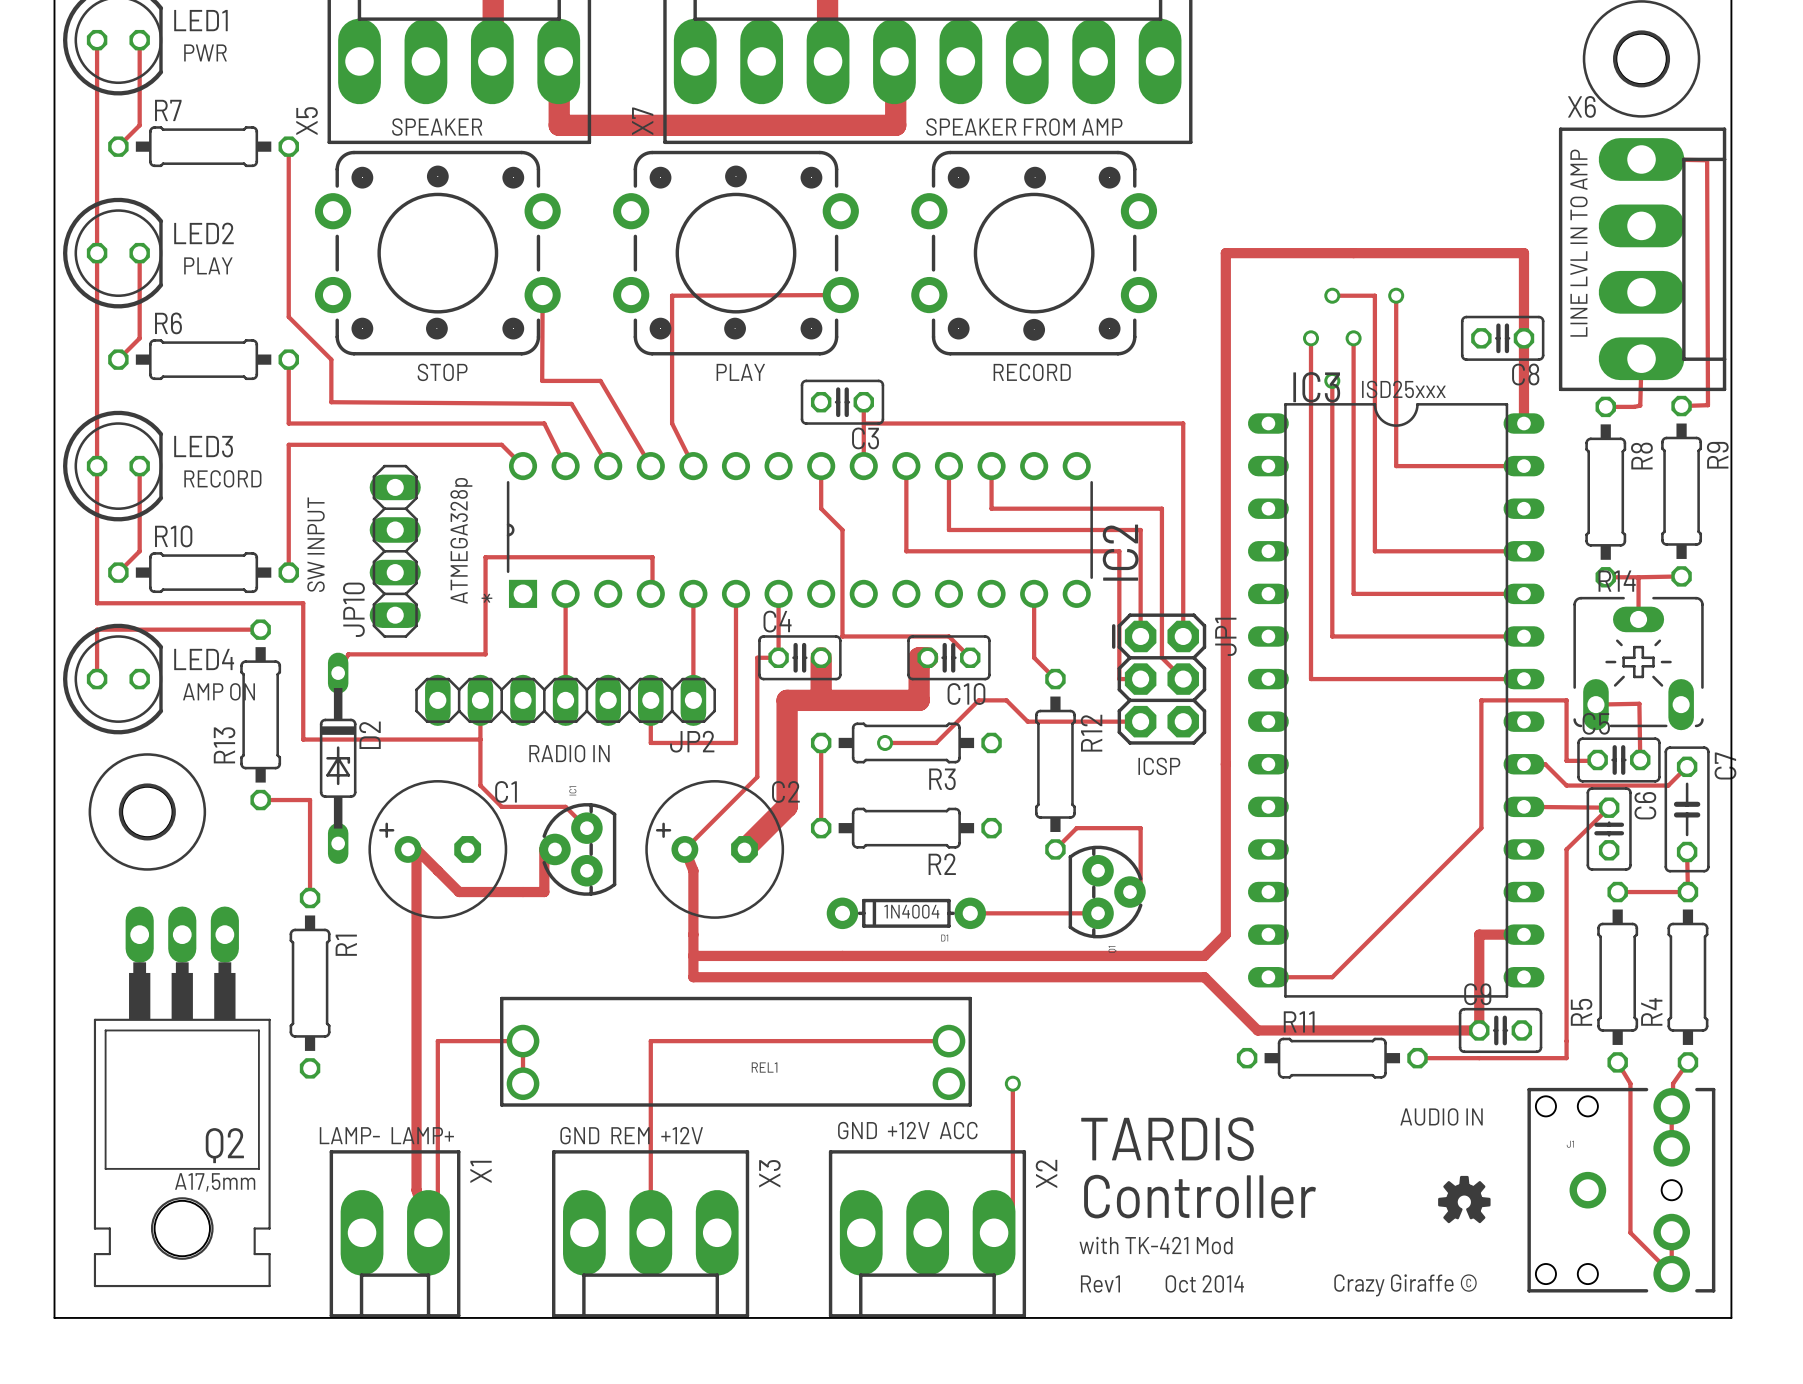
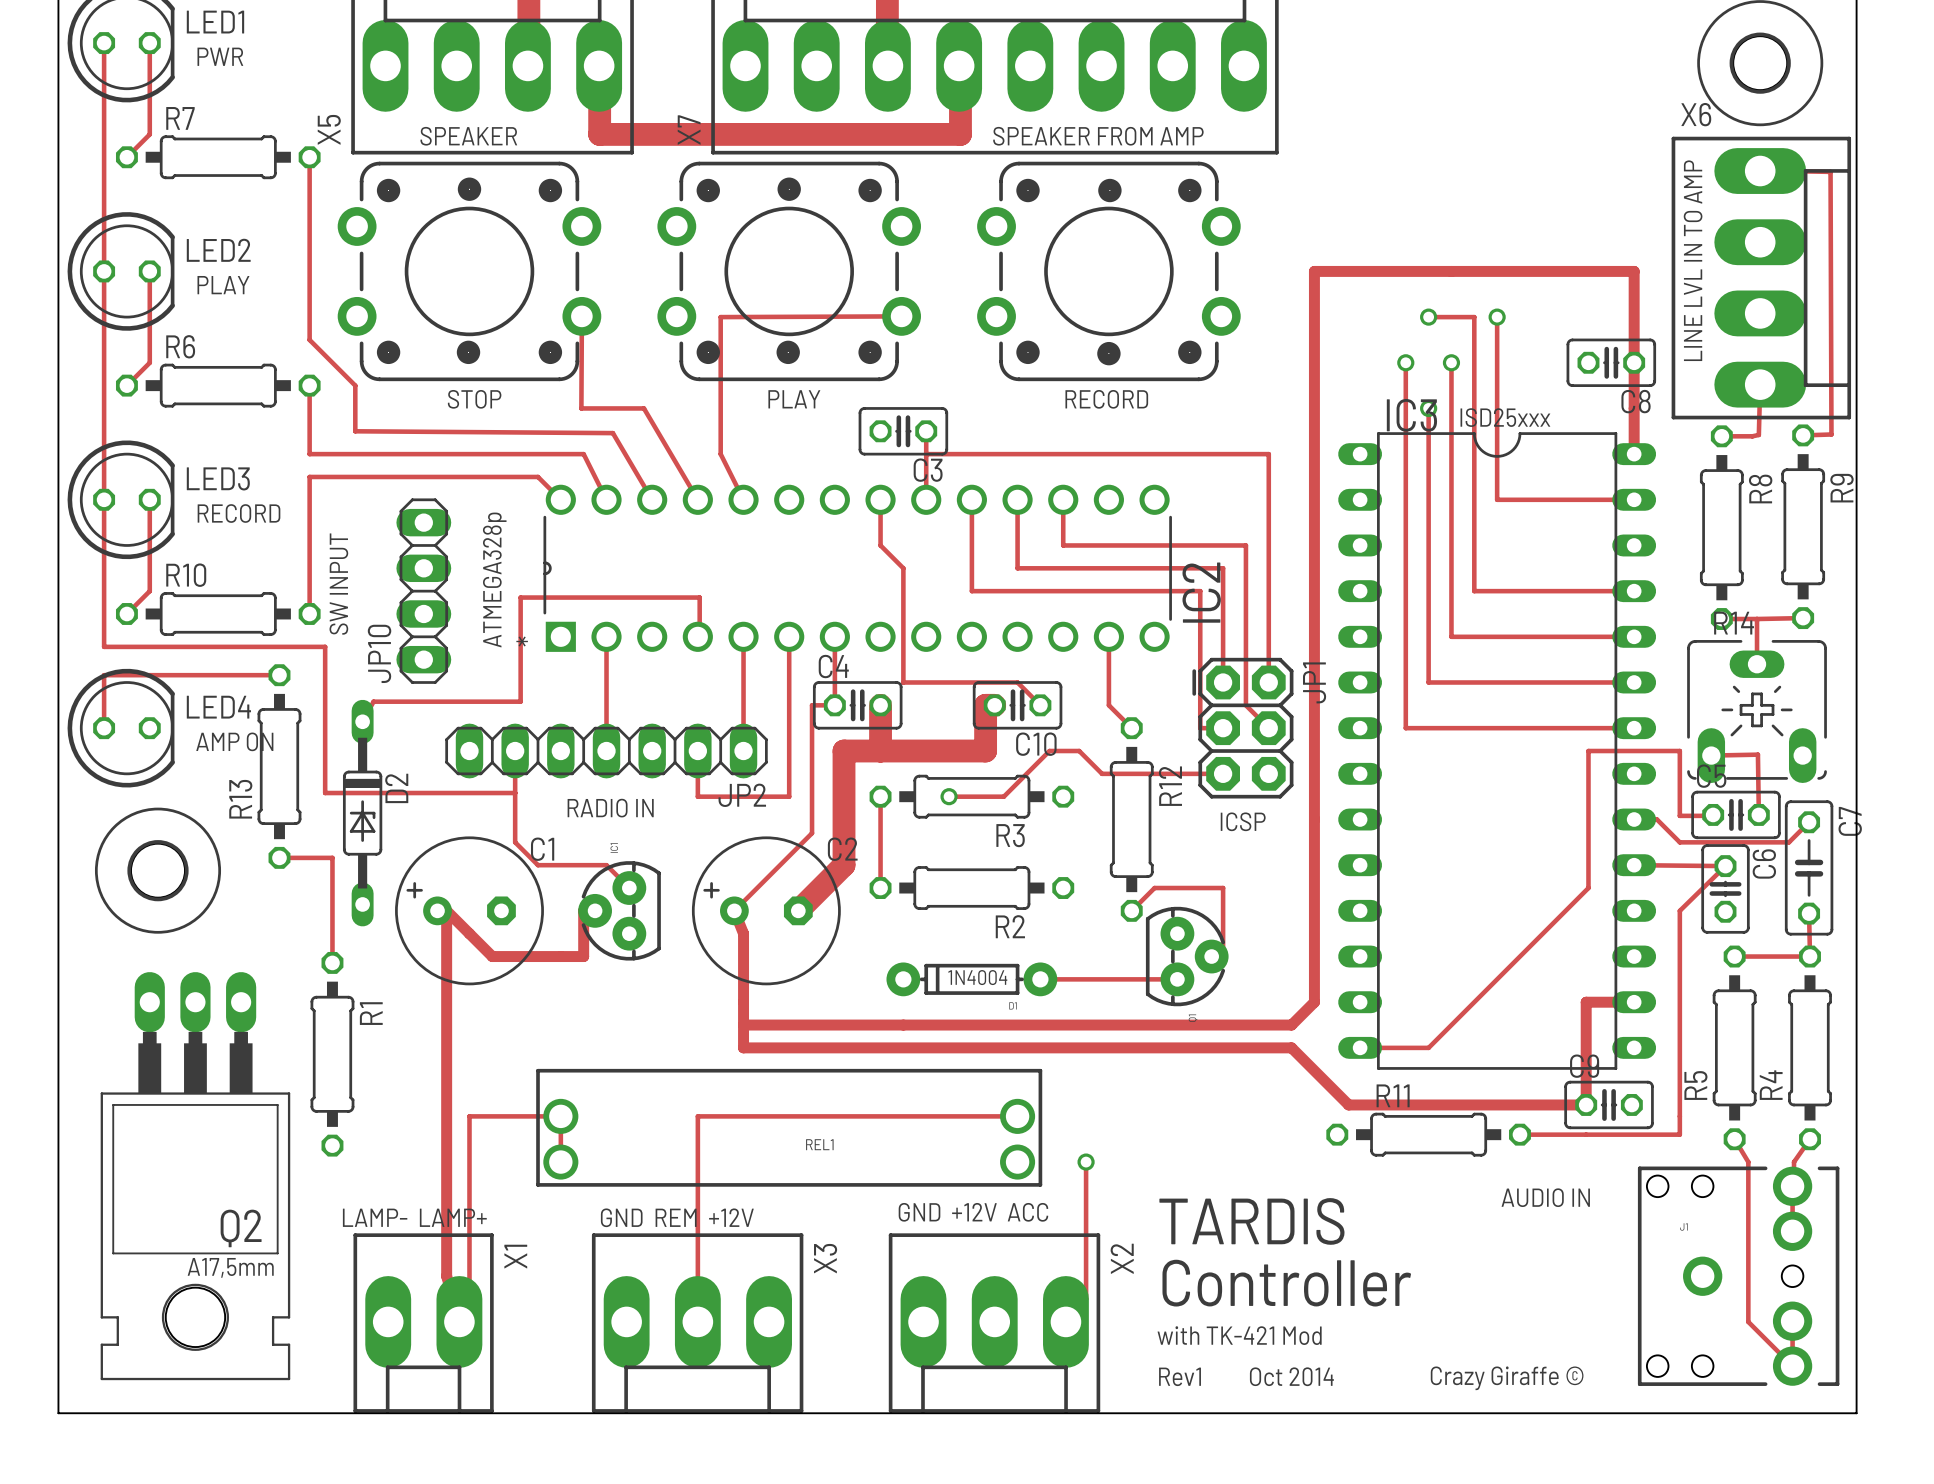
drawing: [1438, 1175, 1491, 1224] -> none

